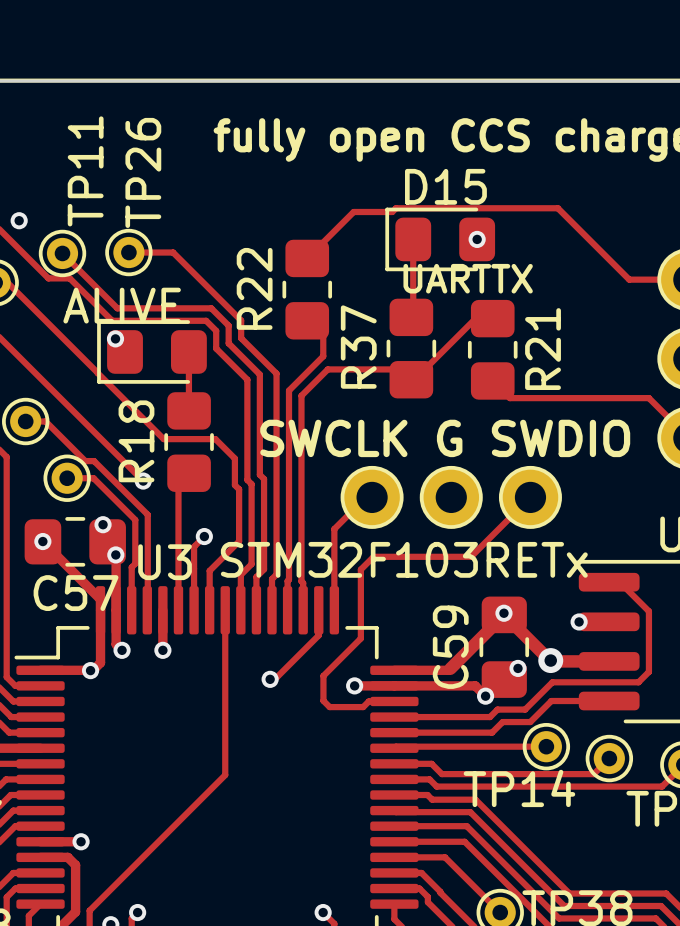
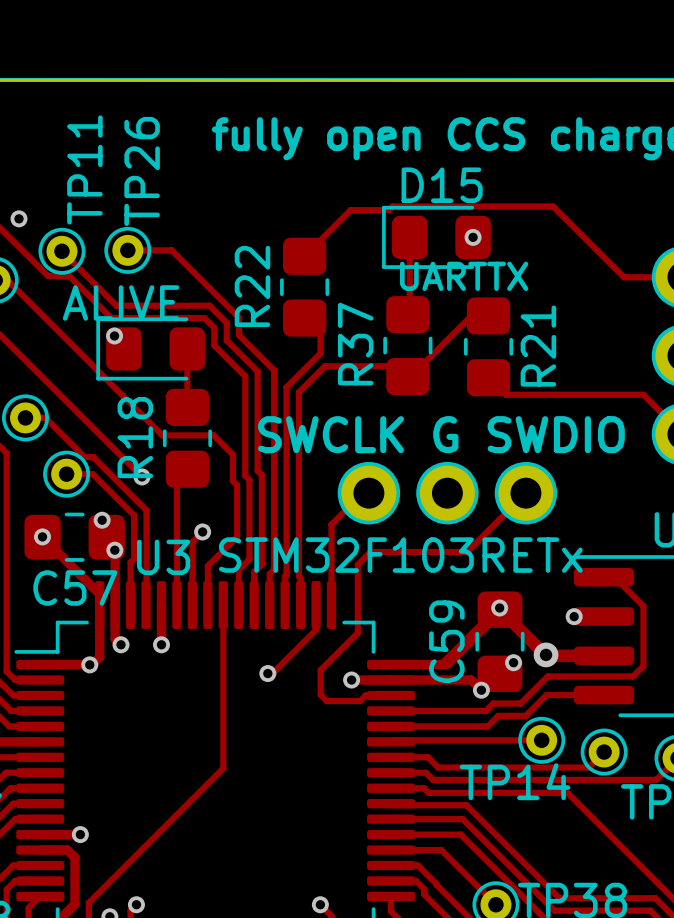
track: (475, 799) (569, 893) (666, 893) -> (471, 792) (567, 792) (660, 885)

